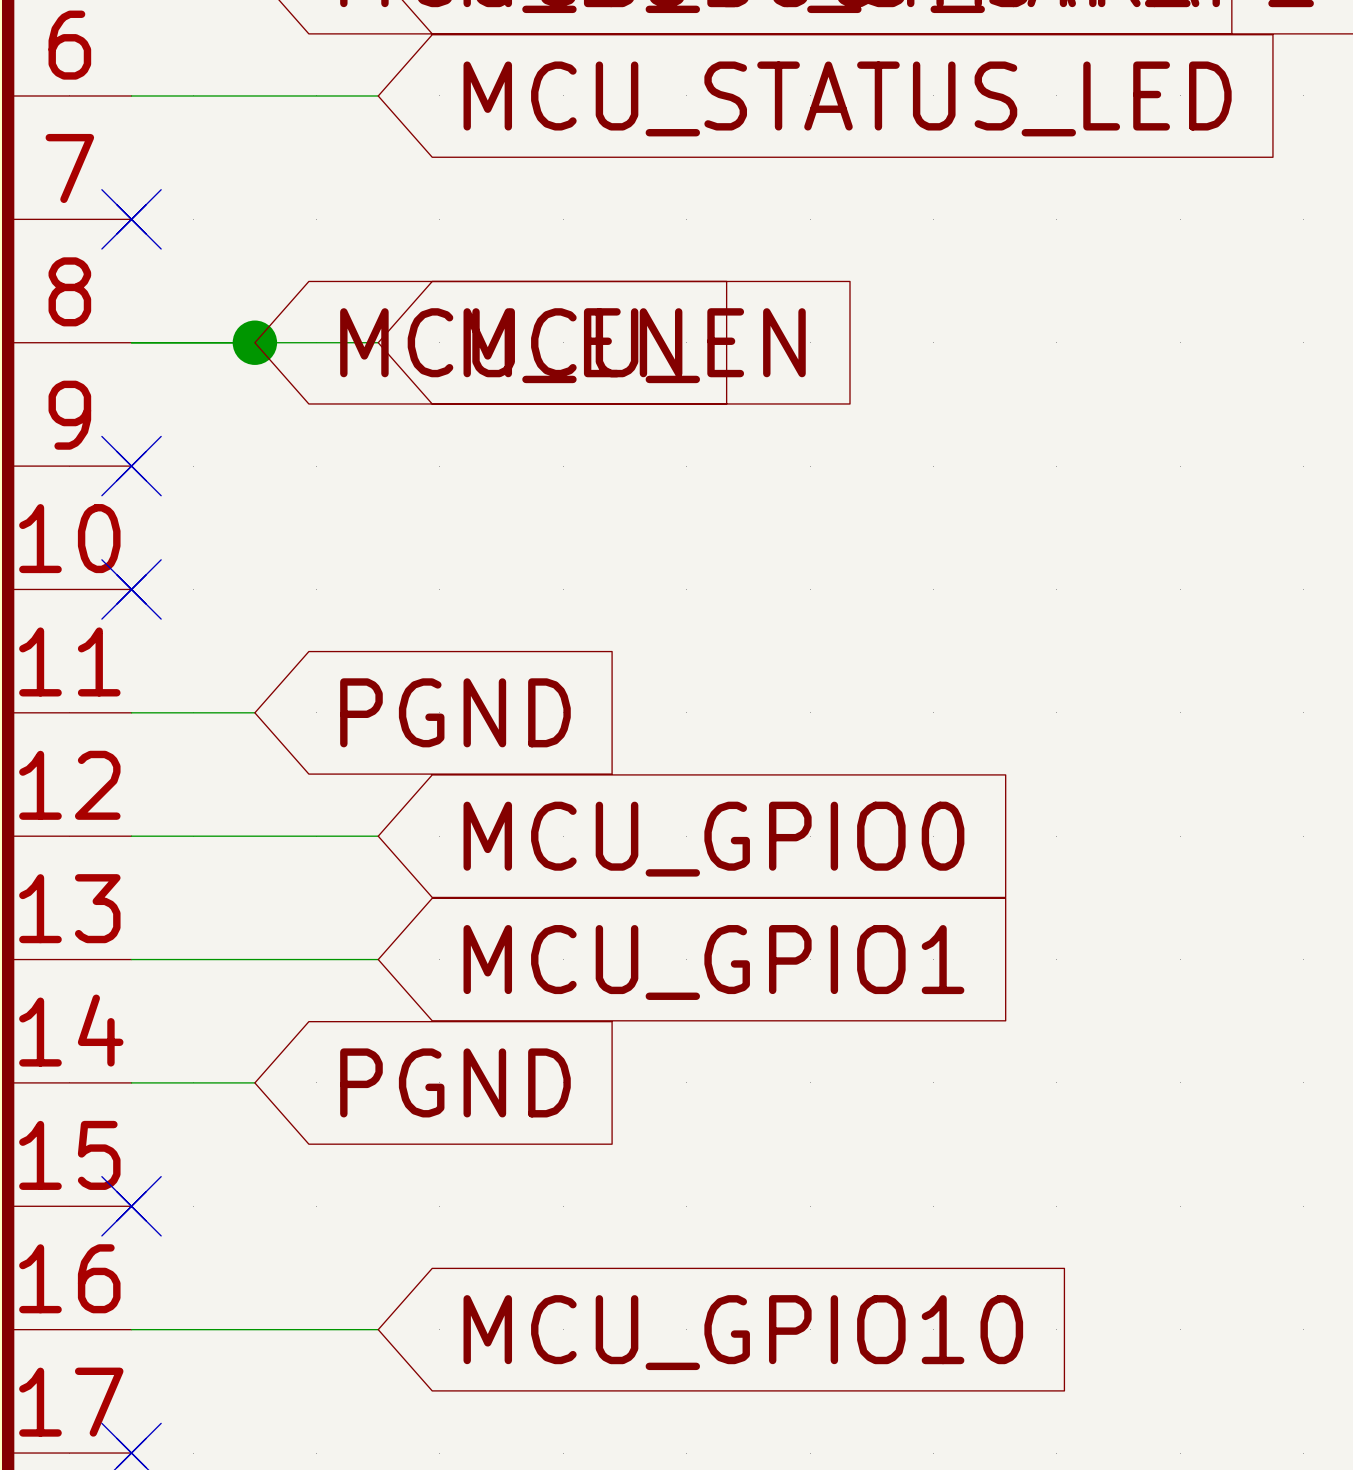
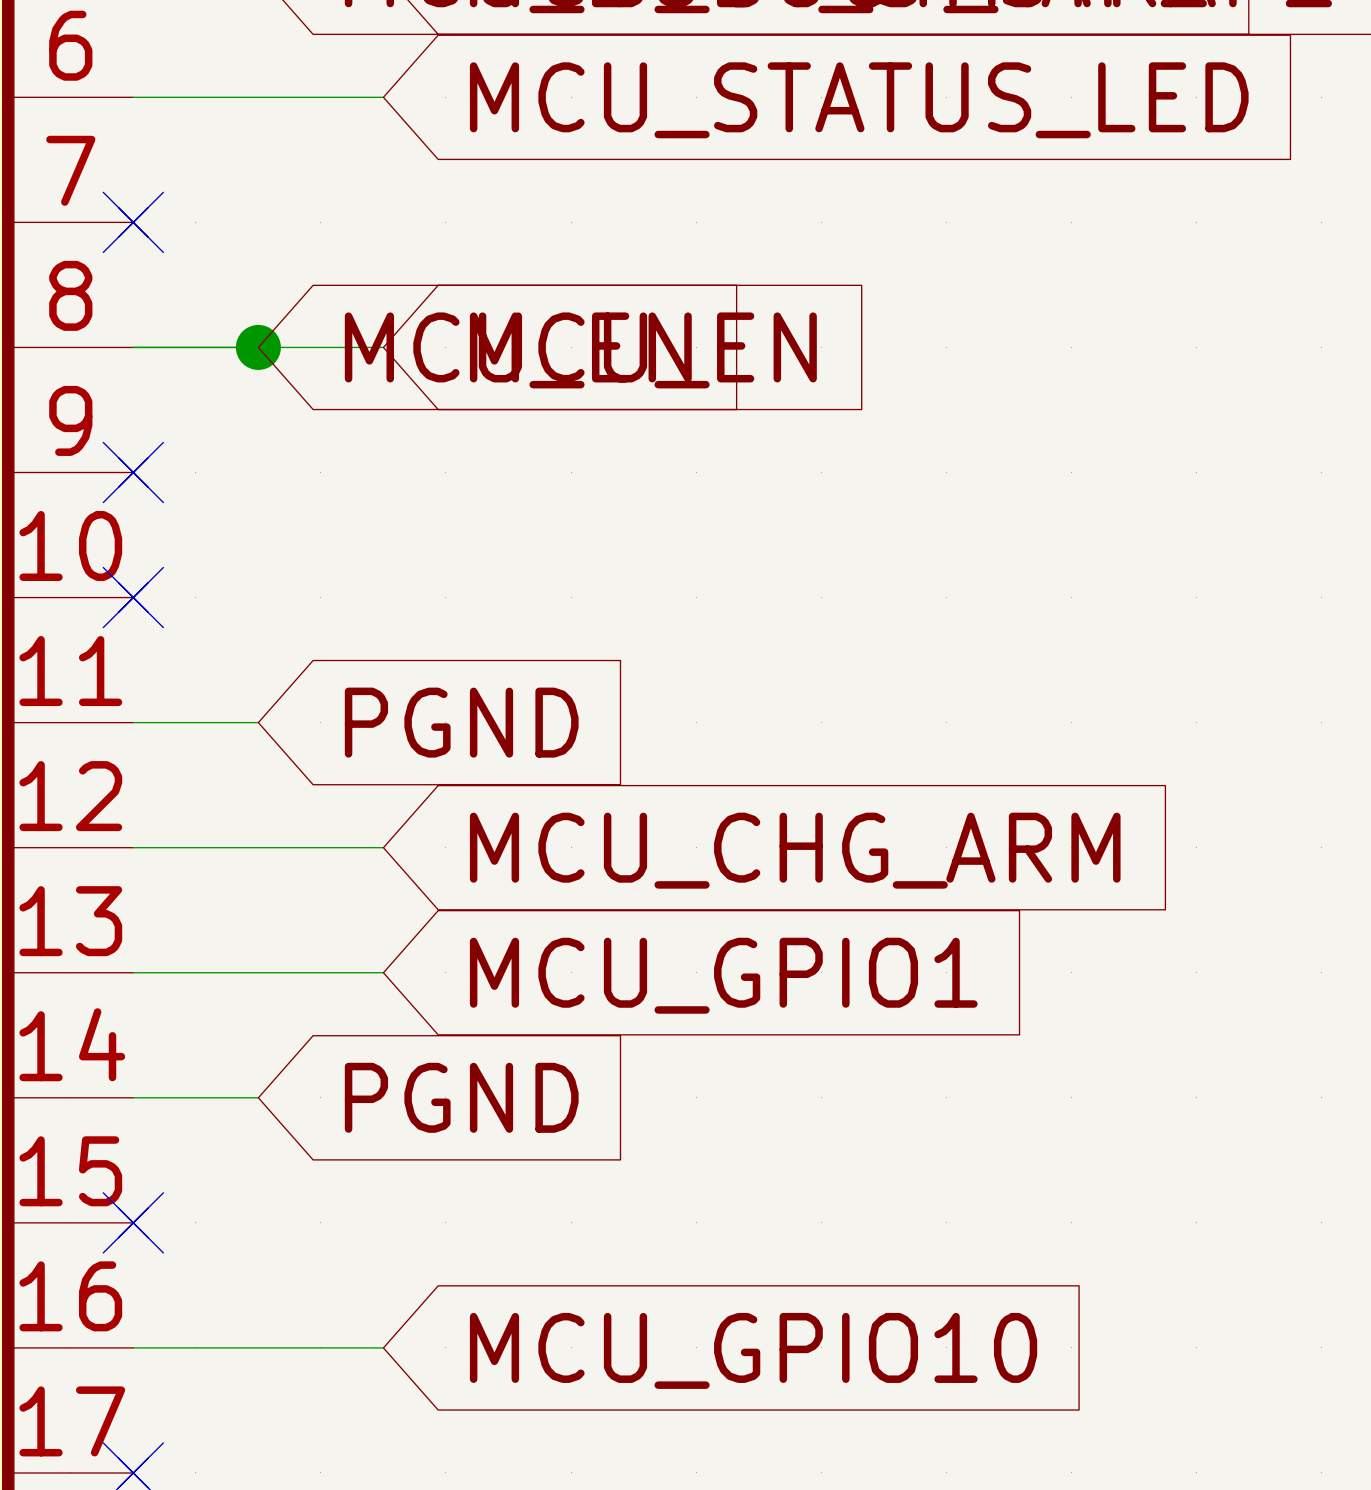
global label: MCU_GPIO0 (713, 839) -> MCU_CHG_ARM (795, 850)

